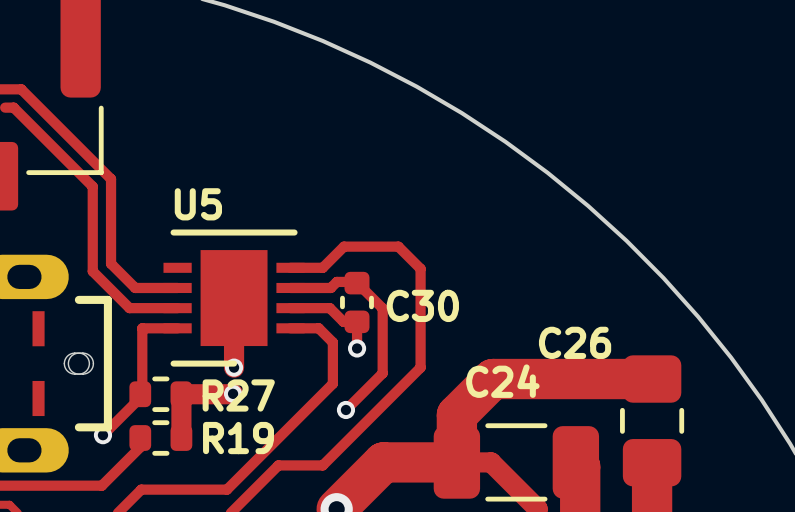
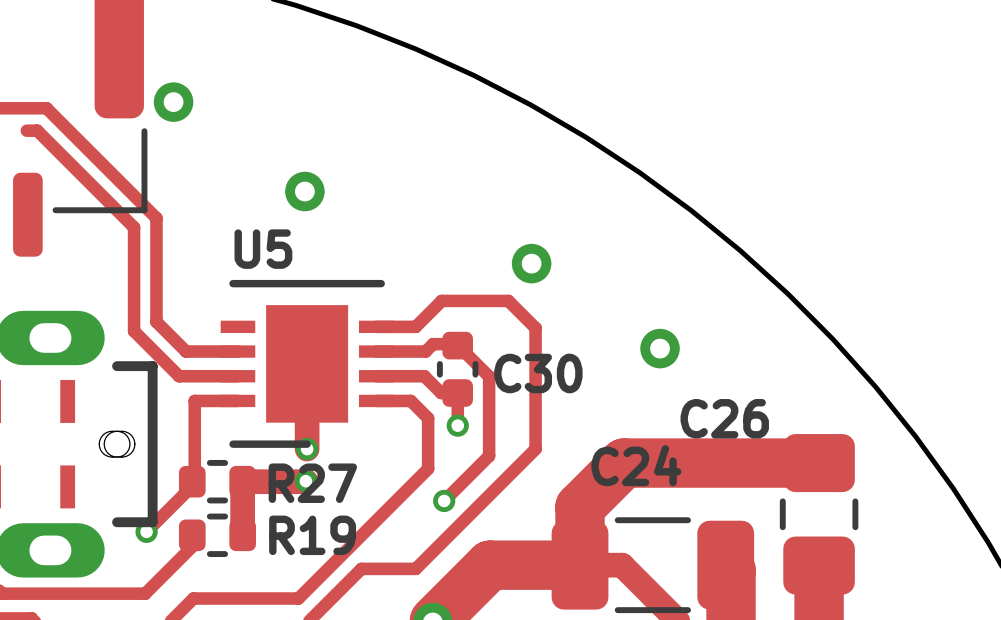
via: none -> (173, 102)
via: none -> (304, 191)
via: none -> (531, 263)
via: none -> (660, 348)

